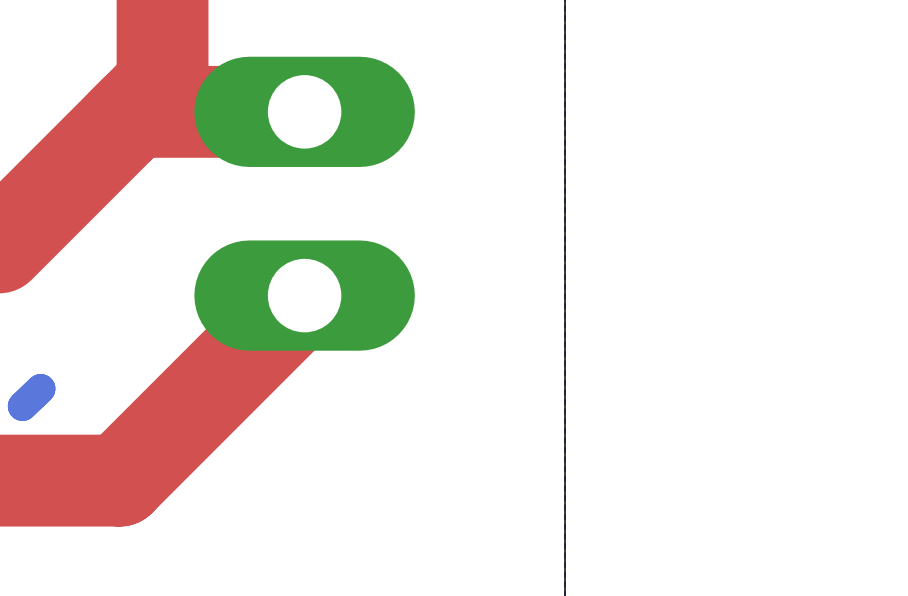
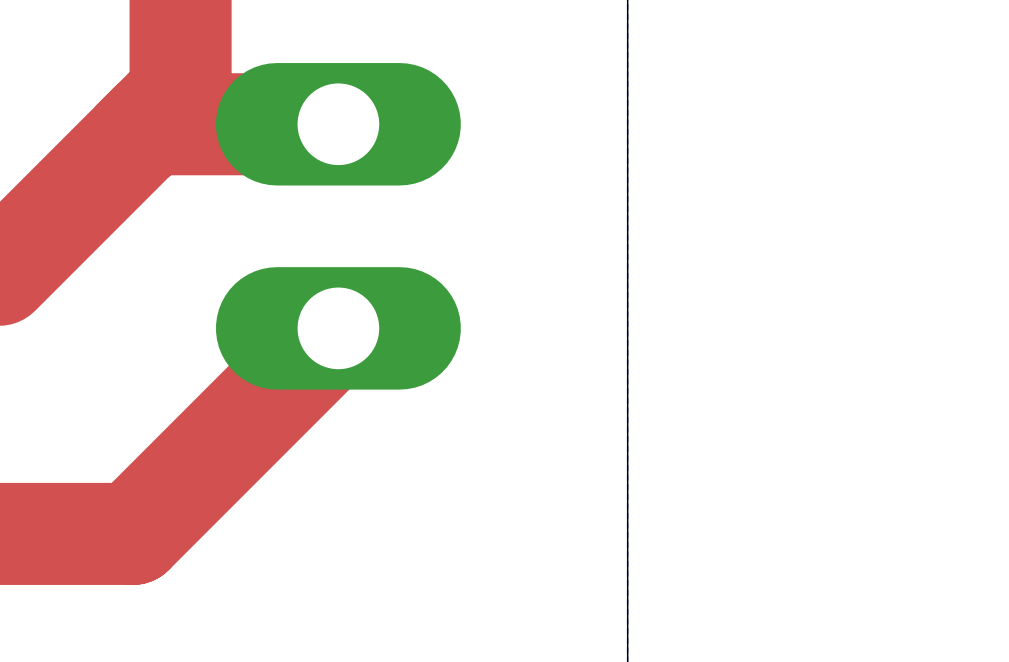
bottom track: (40, 388) (22, 406) -> none

